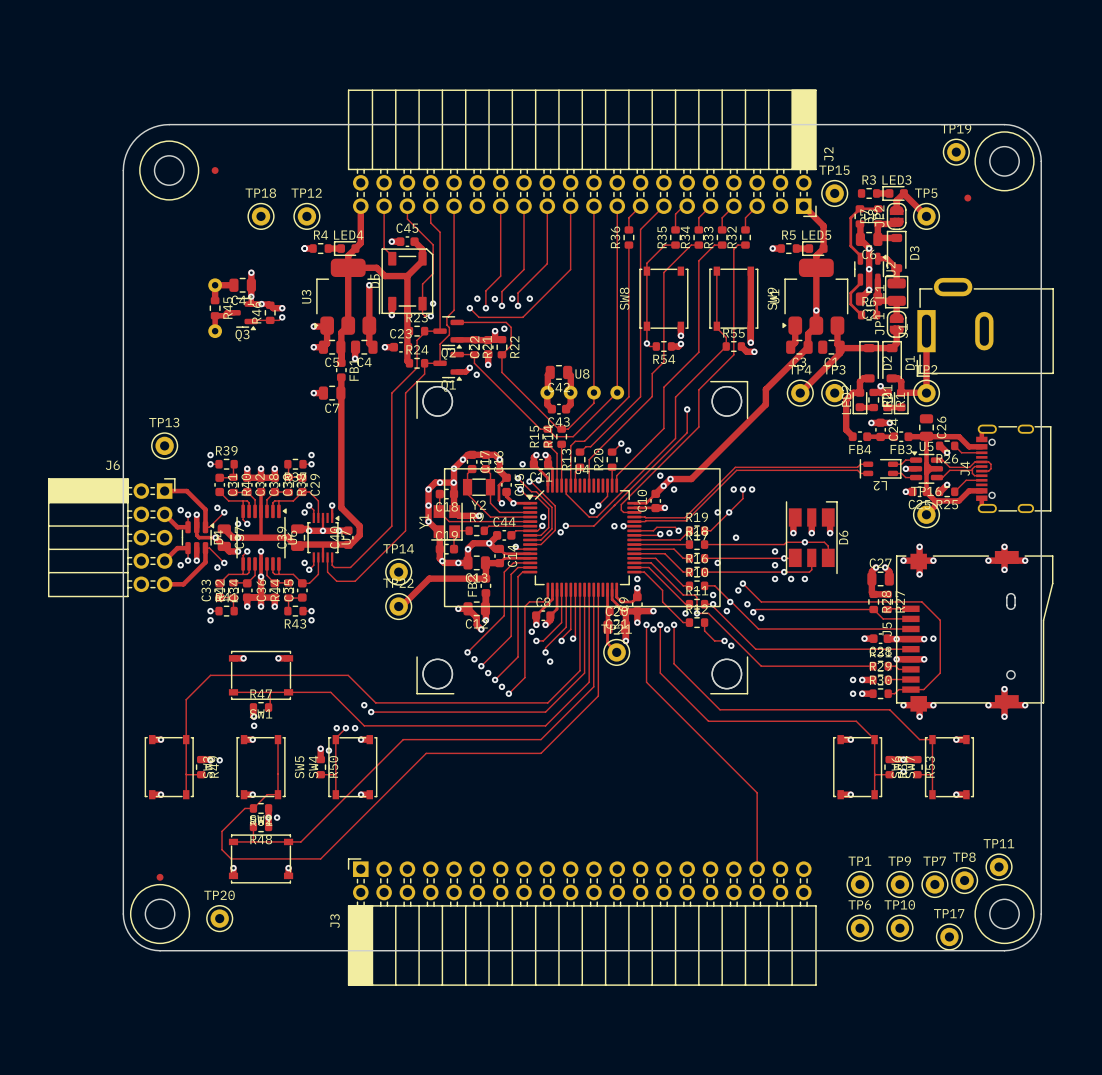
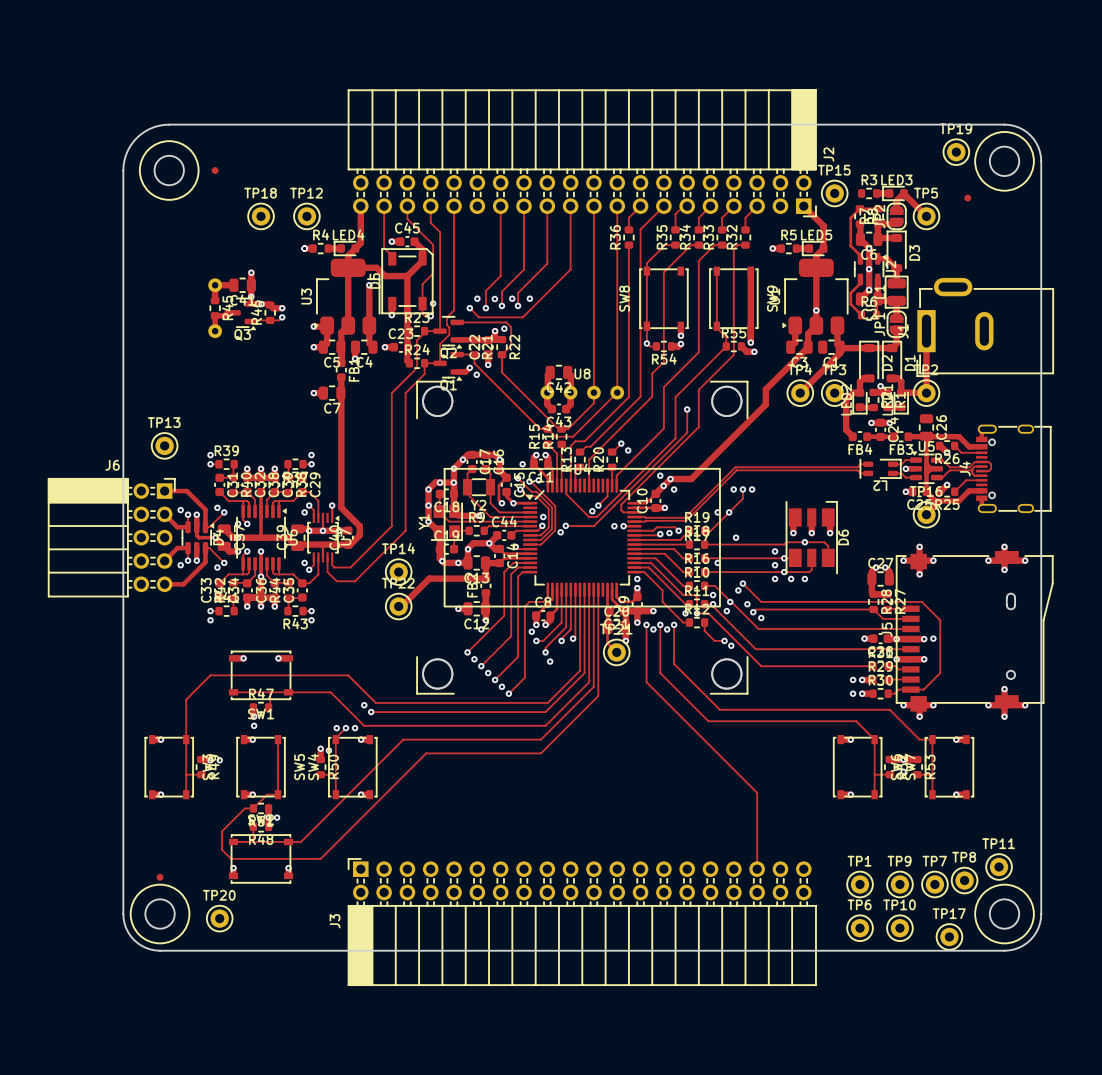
track: (468, 608) (476, 617) (476, 624) (481, 629) -> none

